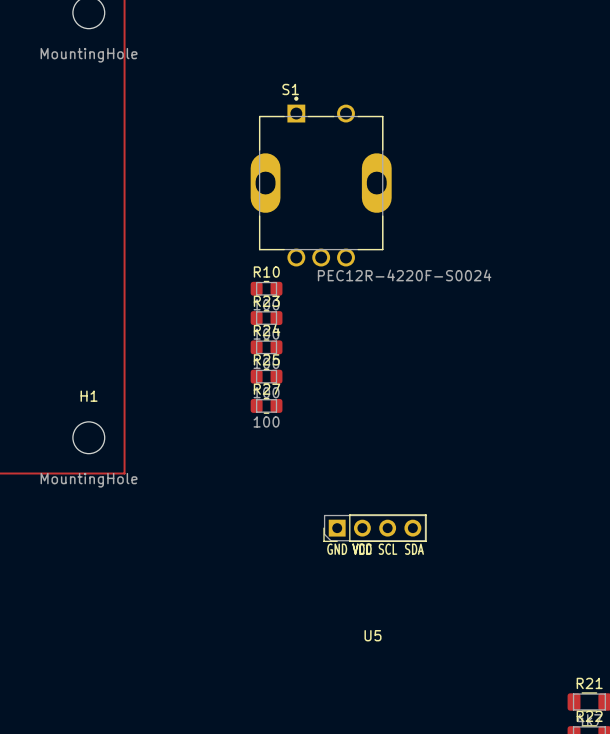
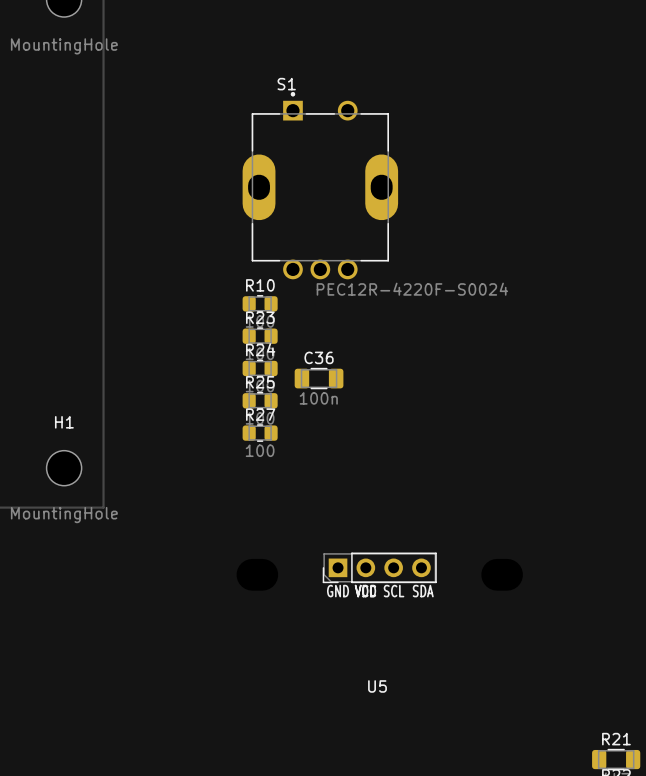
C36: none -> 100n (319, 378)

